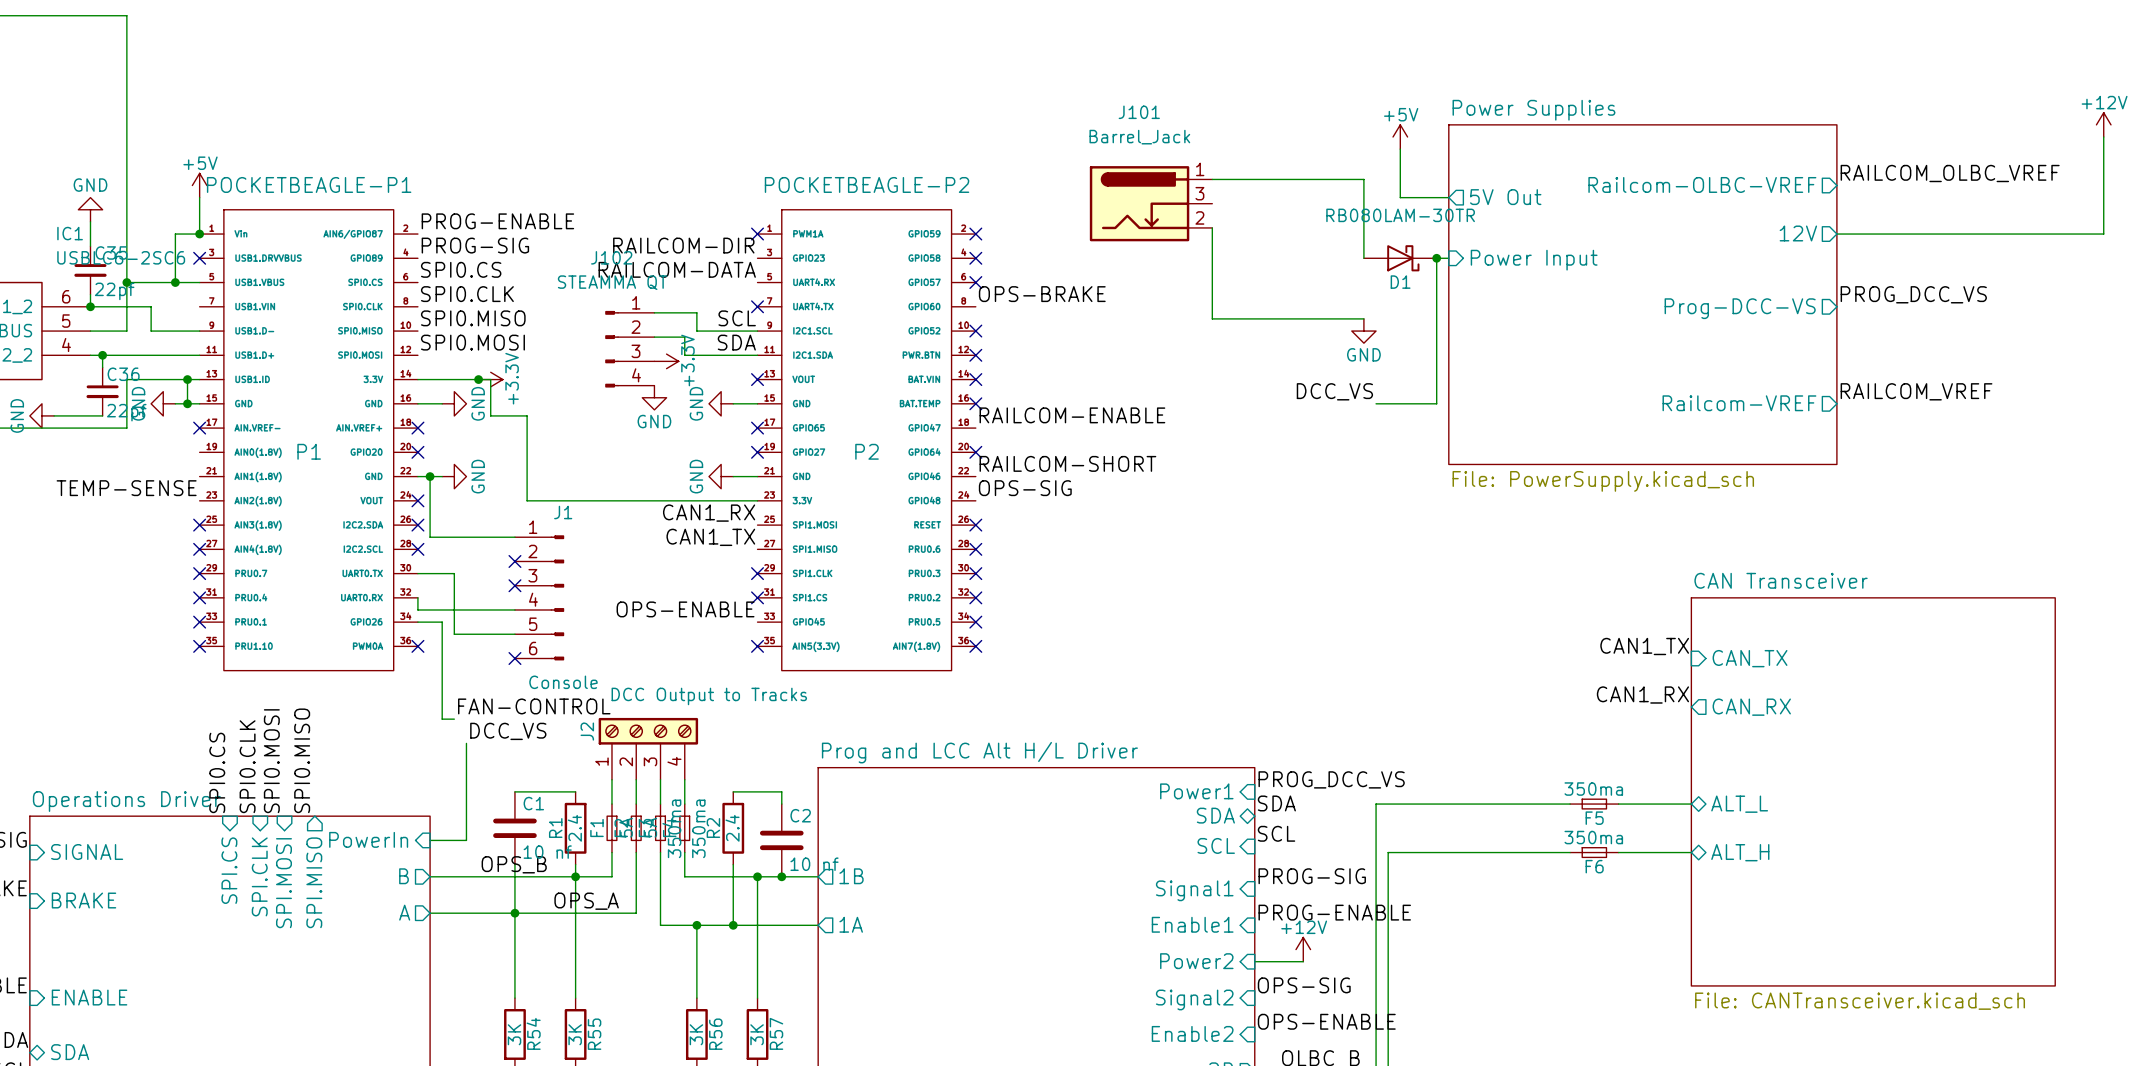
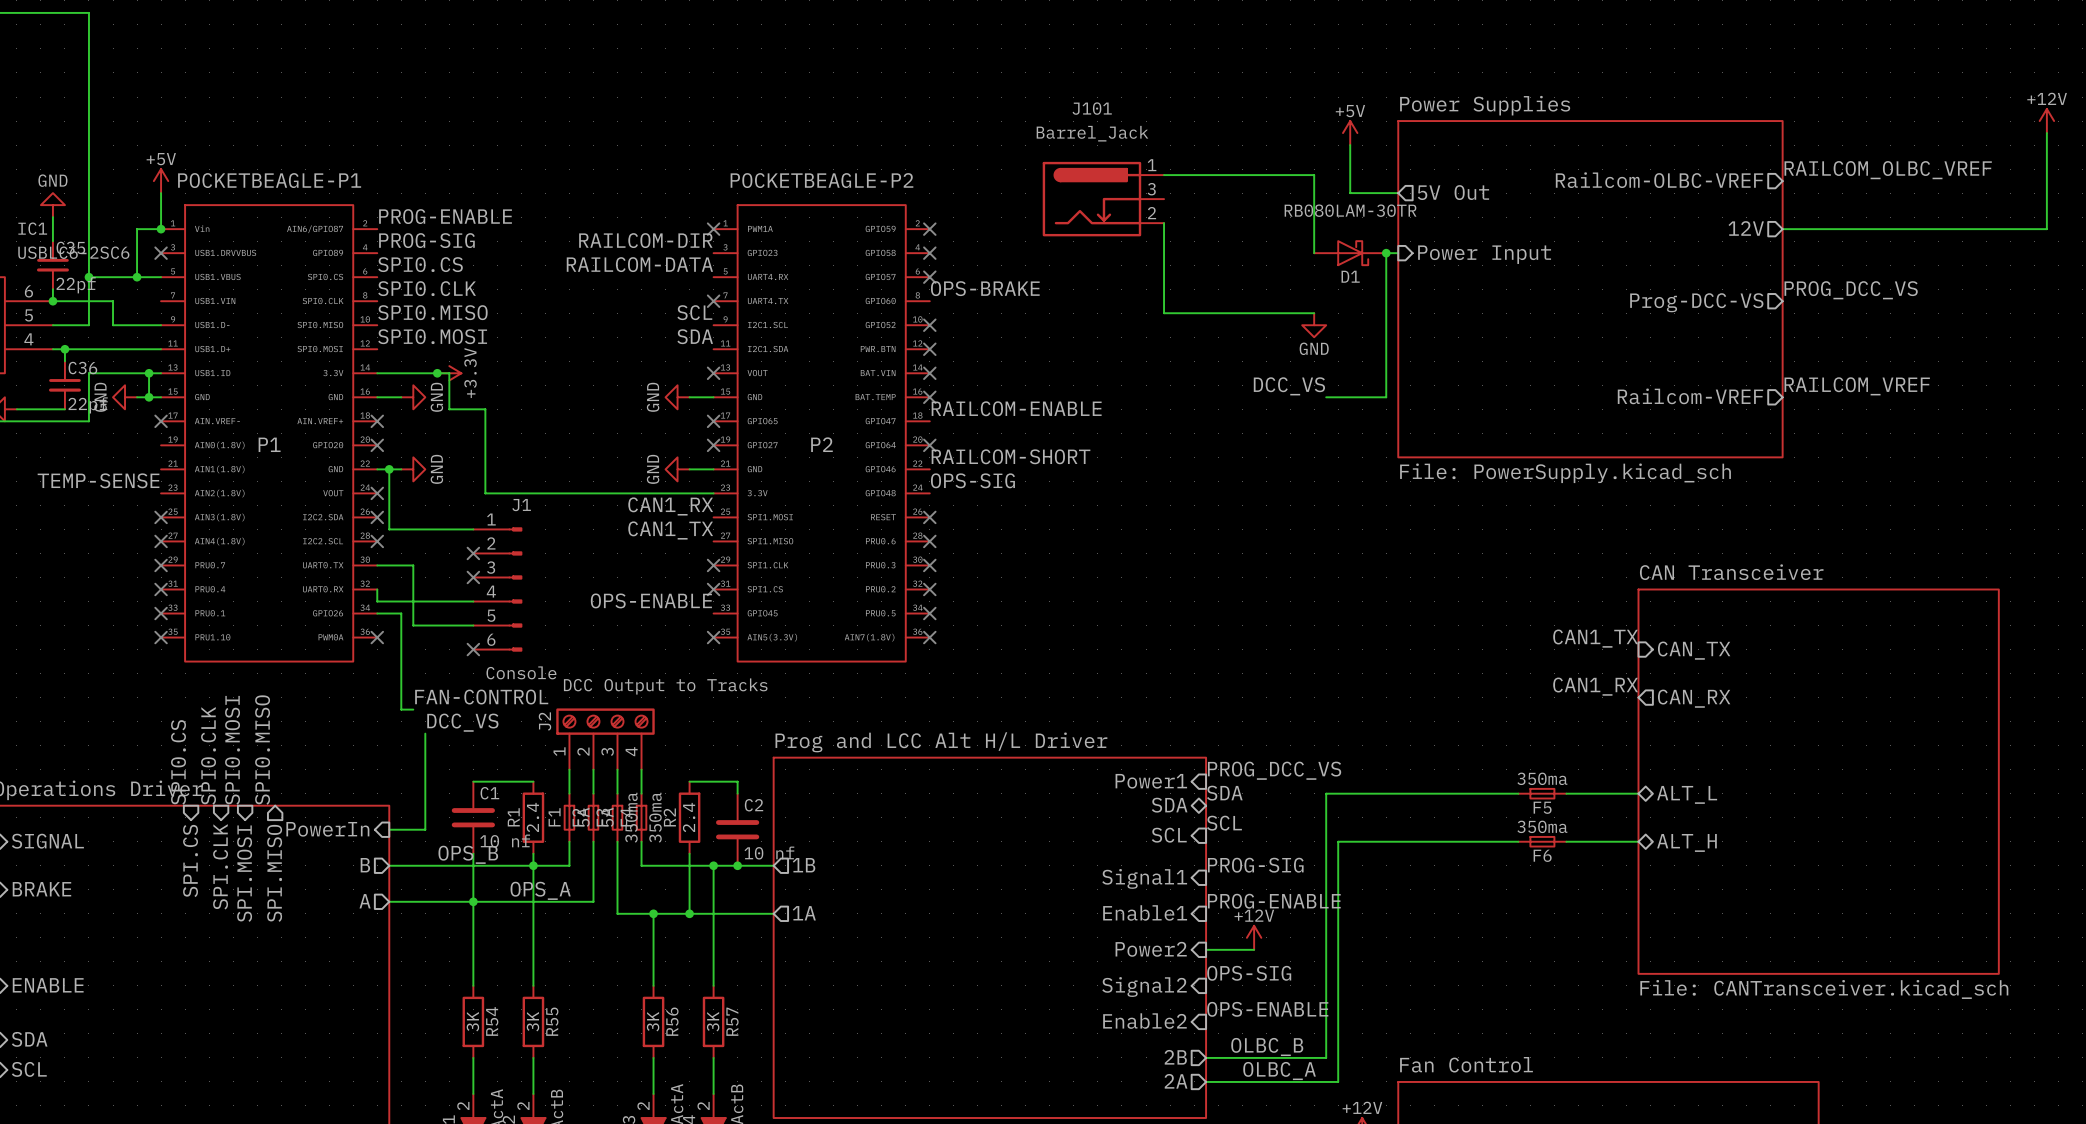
wire: (654, 312) (696, 312) (696, 331) (757, 331) -> none
wire: (654, 337) (684, 337) (684, 355) (757, 355) -> none
J102: STEAMMA QT (629, 349) -> none
power symbol: +3.3V (666, 361) -> none
power symbol: GND (654, 397) -> none

